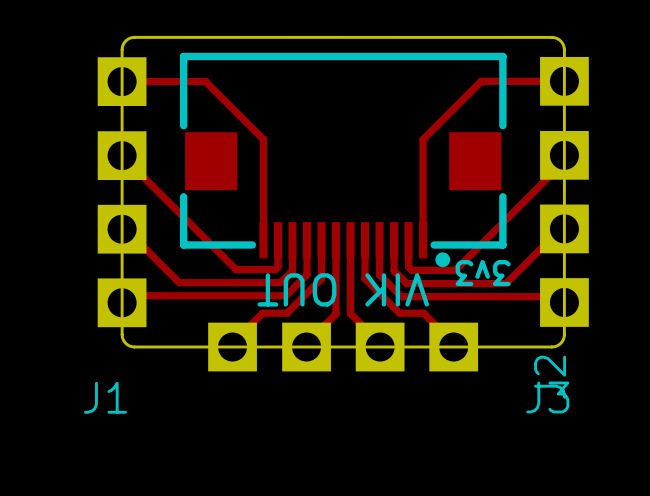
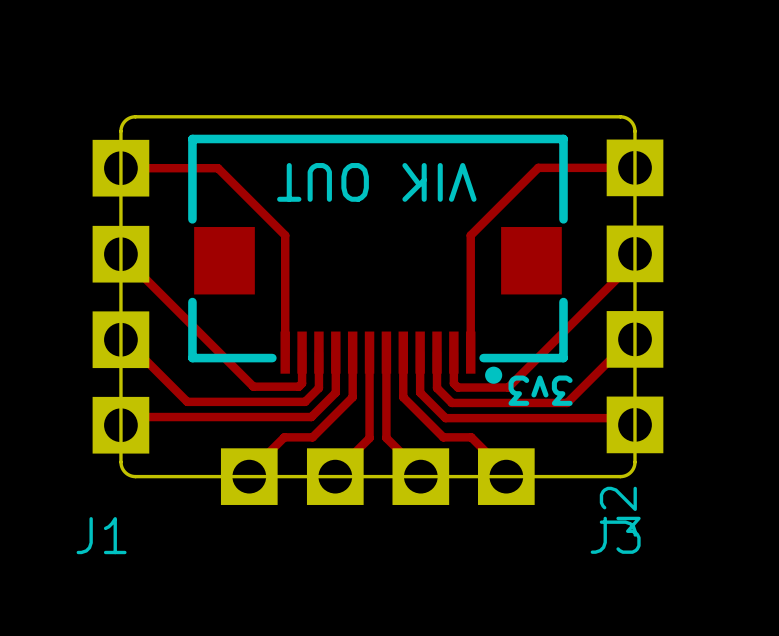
part text position: VIK OUT (343, 289) -> VIK OUT (376, 182)

